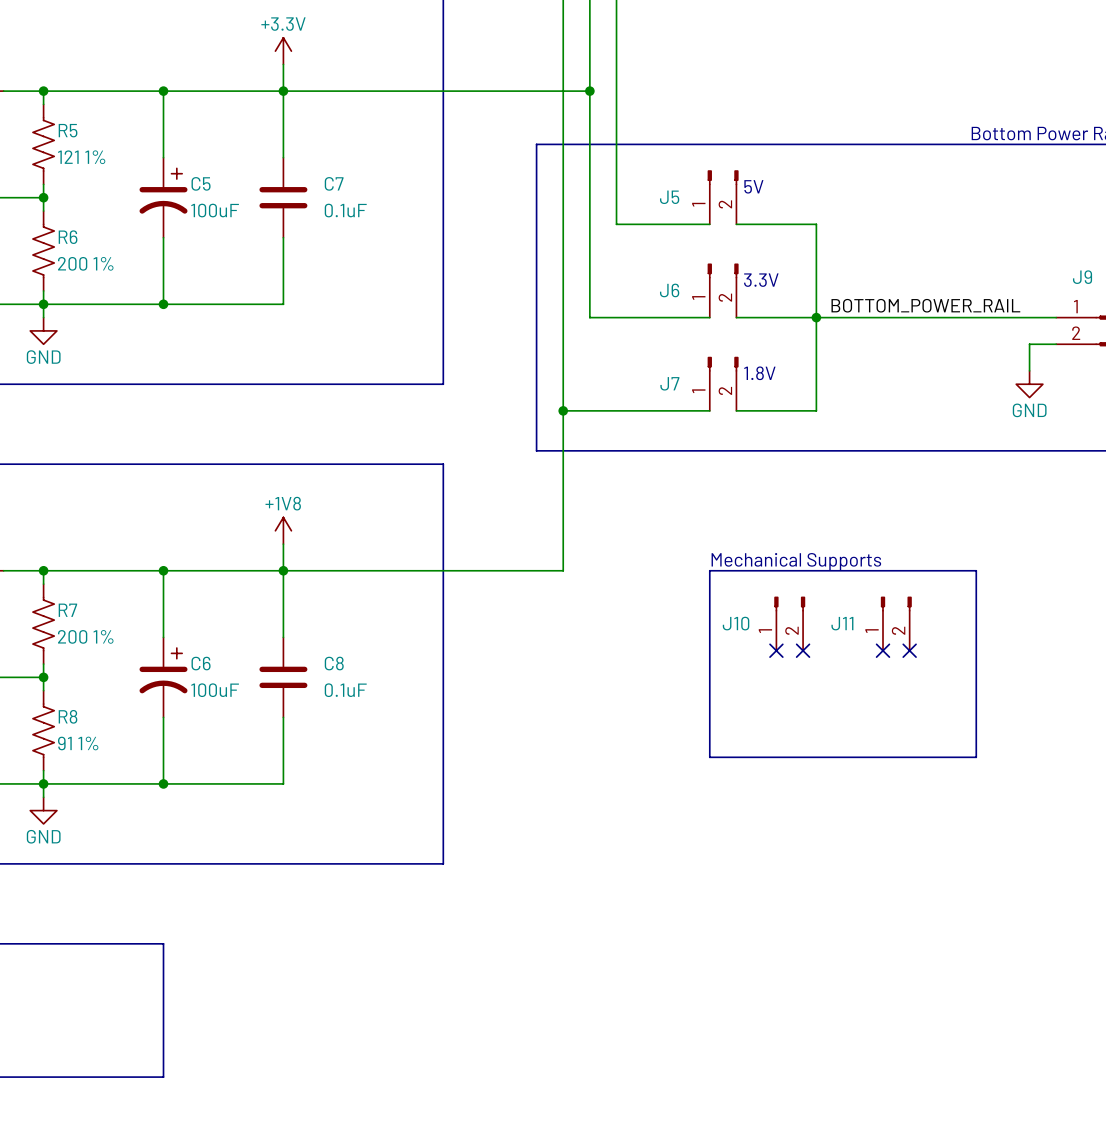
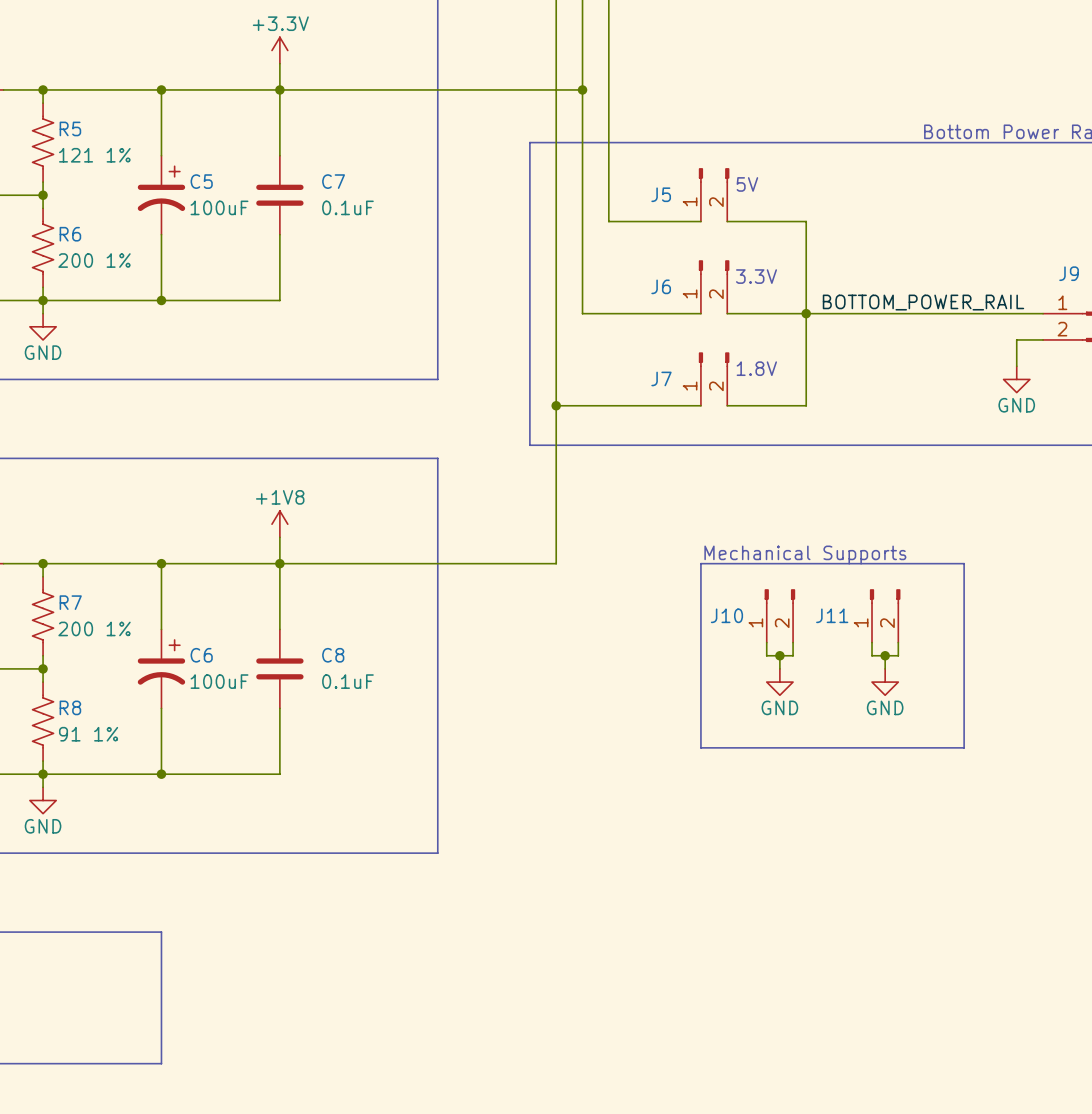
wire: none -> (766, 642) (766, 655) (793, 655) (793, 642)
no-connect mark: (776, 650) -> none
no-connect mark: (803, 650) -> none
wire: none -> (872, 642) (872, 655) (898, 655) (898, 642)
no-connect mark: (883, 650) -> none
no-connect mark: (909, 650) -> none
wire: none -> (779, 655) (779, 668)
junction: none -> (779, 655)
wire: none -> (885, 655) (885, 668)
junction: none -> (885, 655)
power symbol: none -> GND (779, 682)
power symbol: none -> GND (885, 682)

